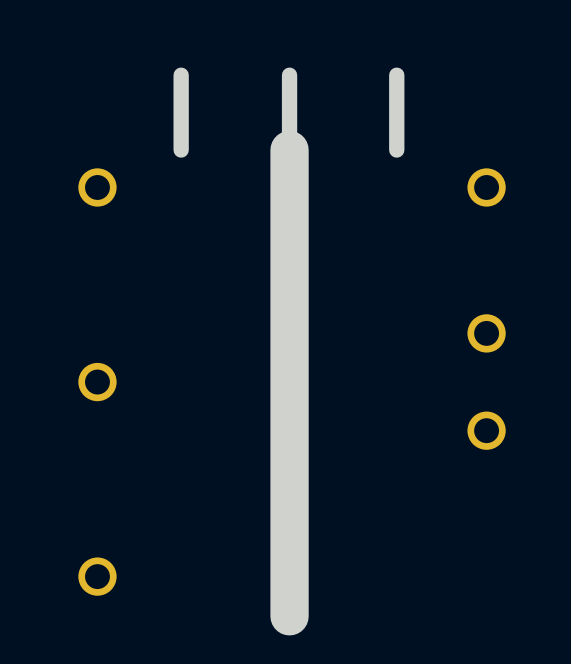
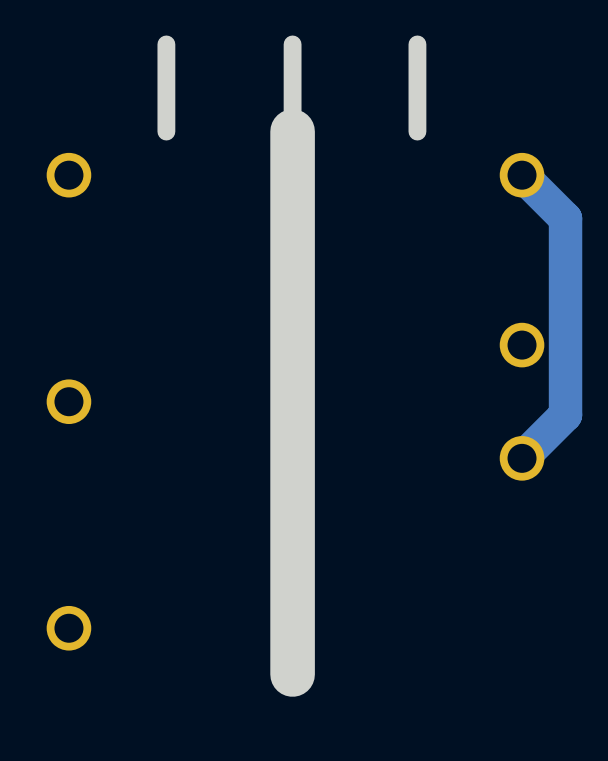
track: none -> (522, 175) (565, 218) (565, 414) (522, 458)

